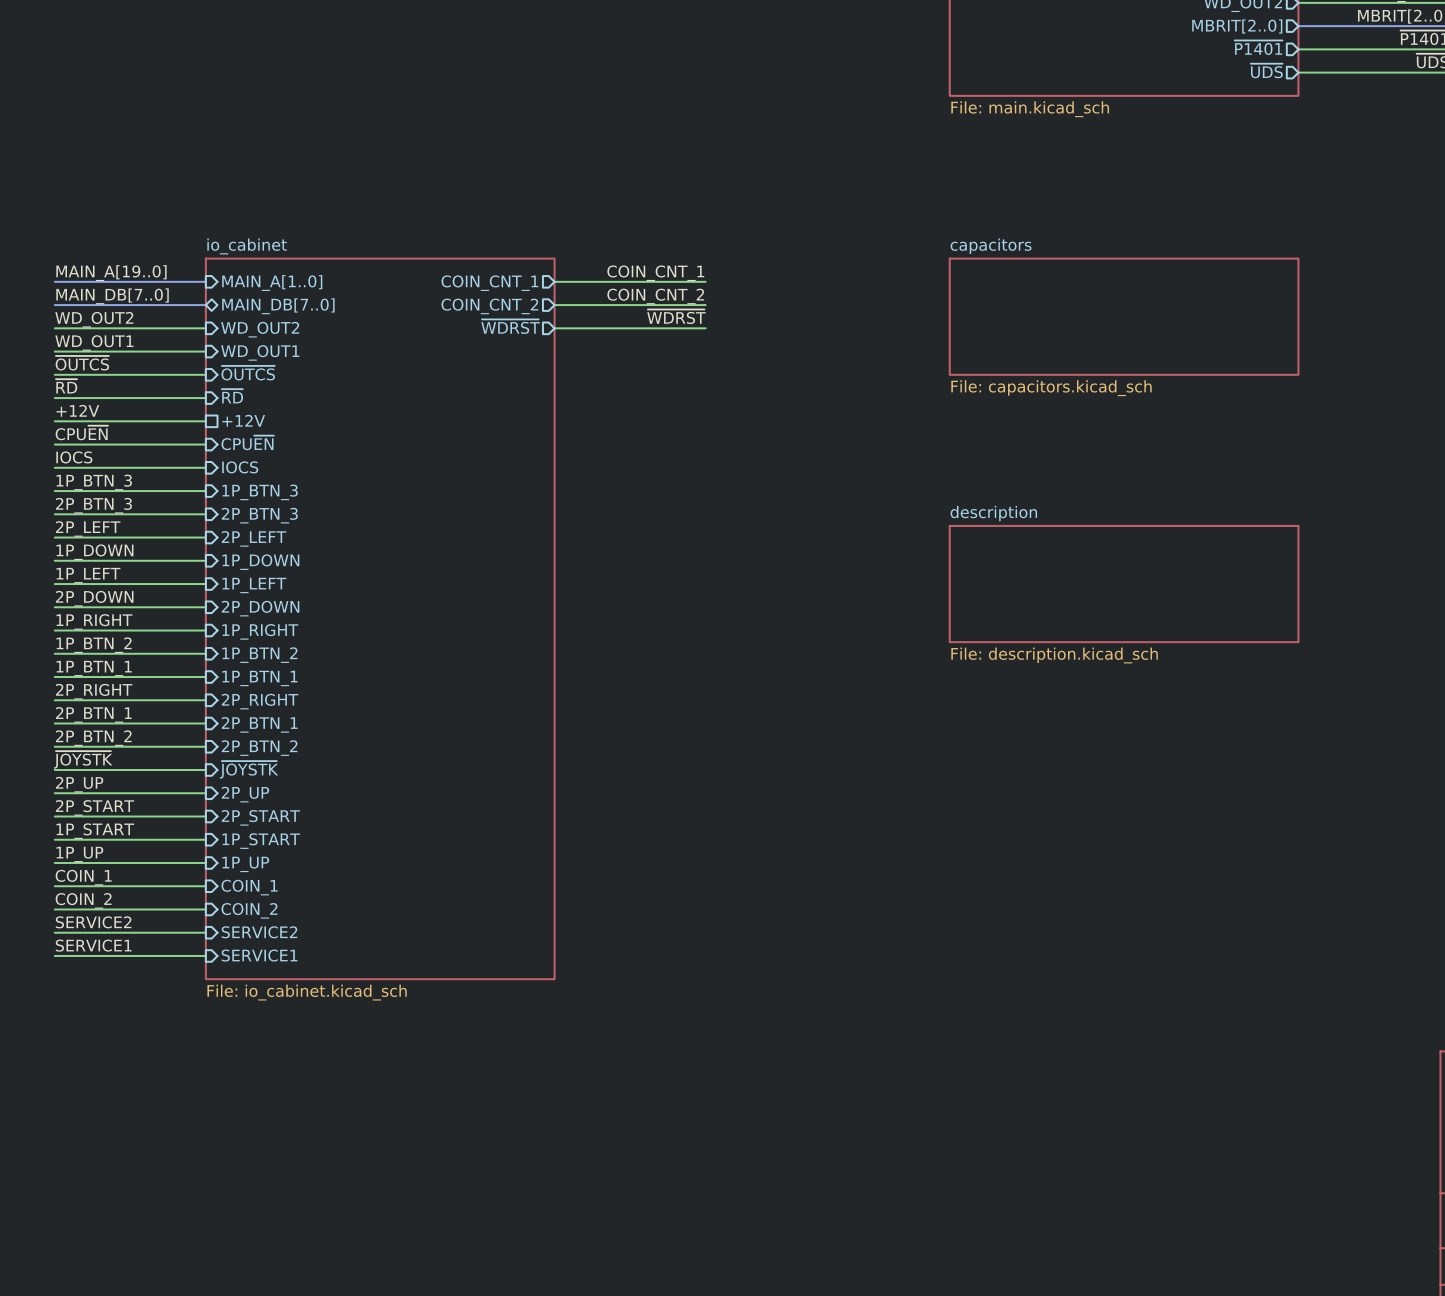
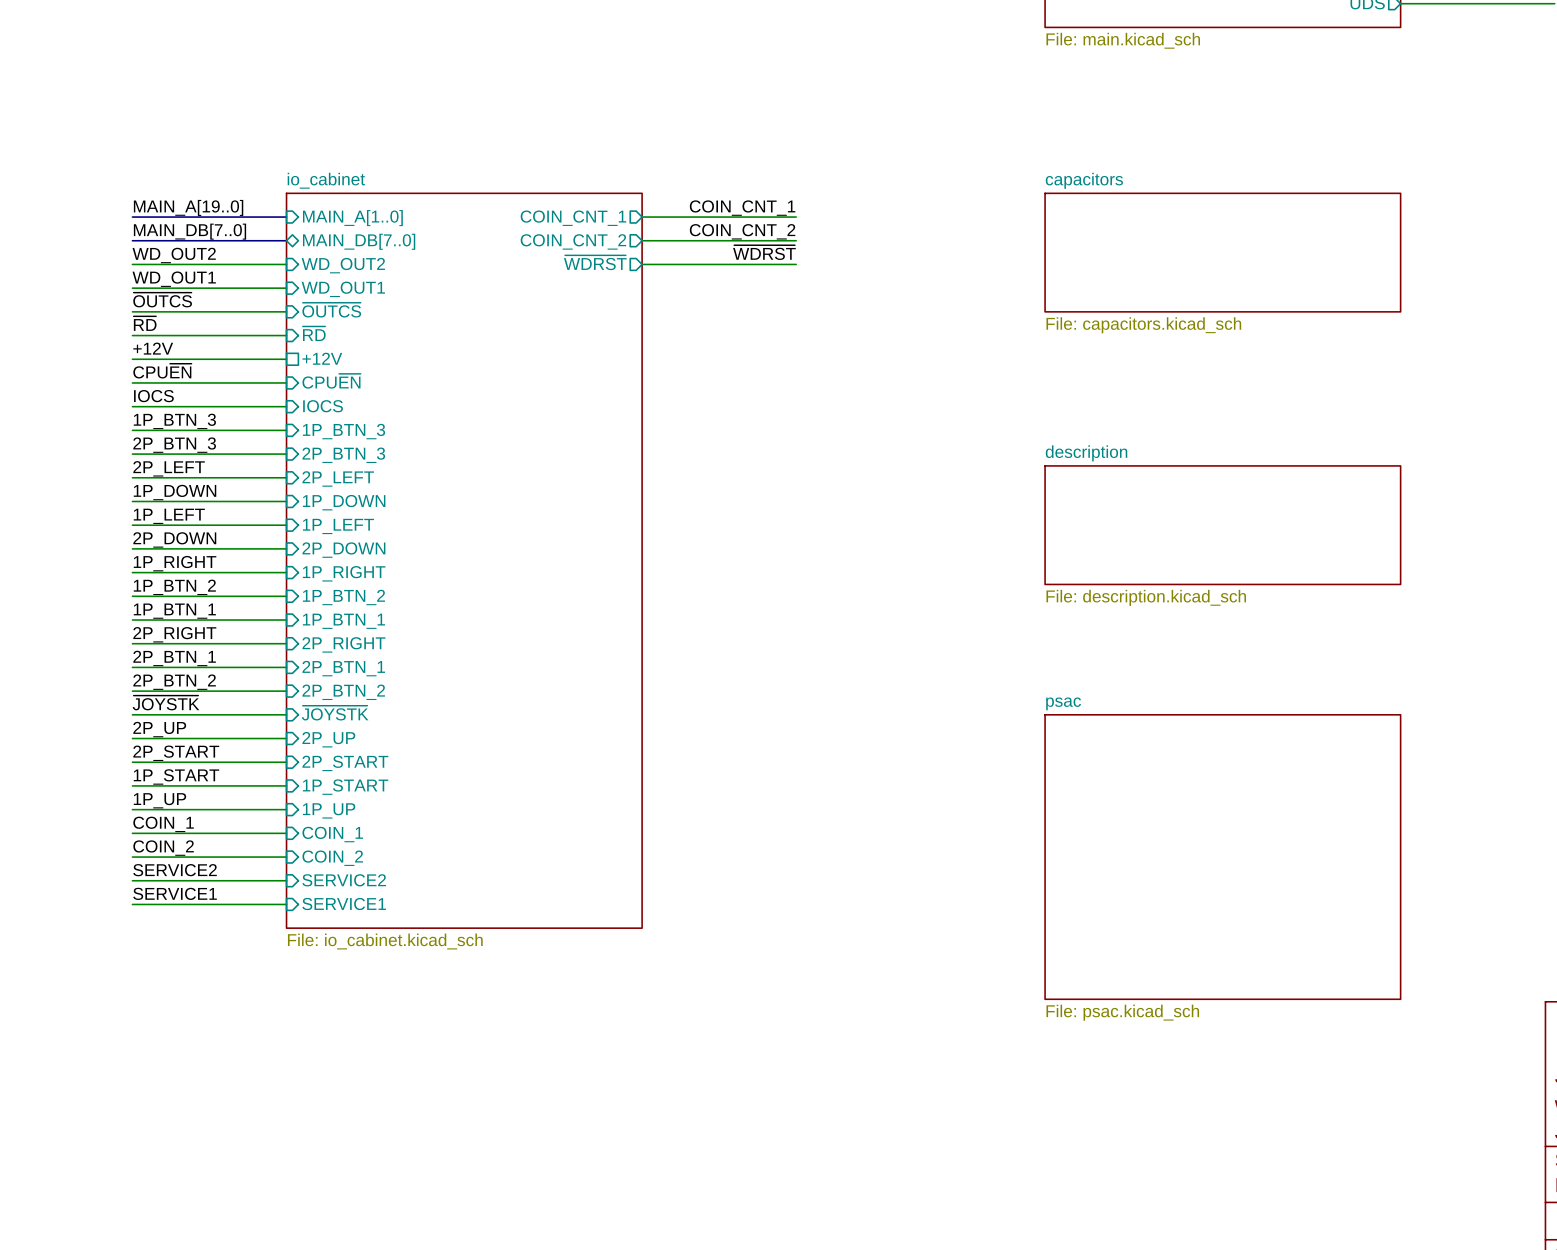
sheet psac: none -> File: psac.kicad_sch (1222, 857)

